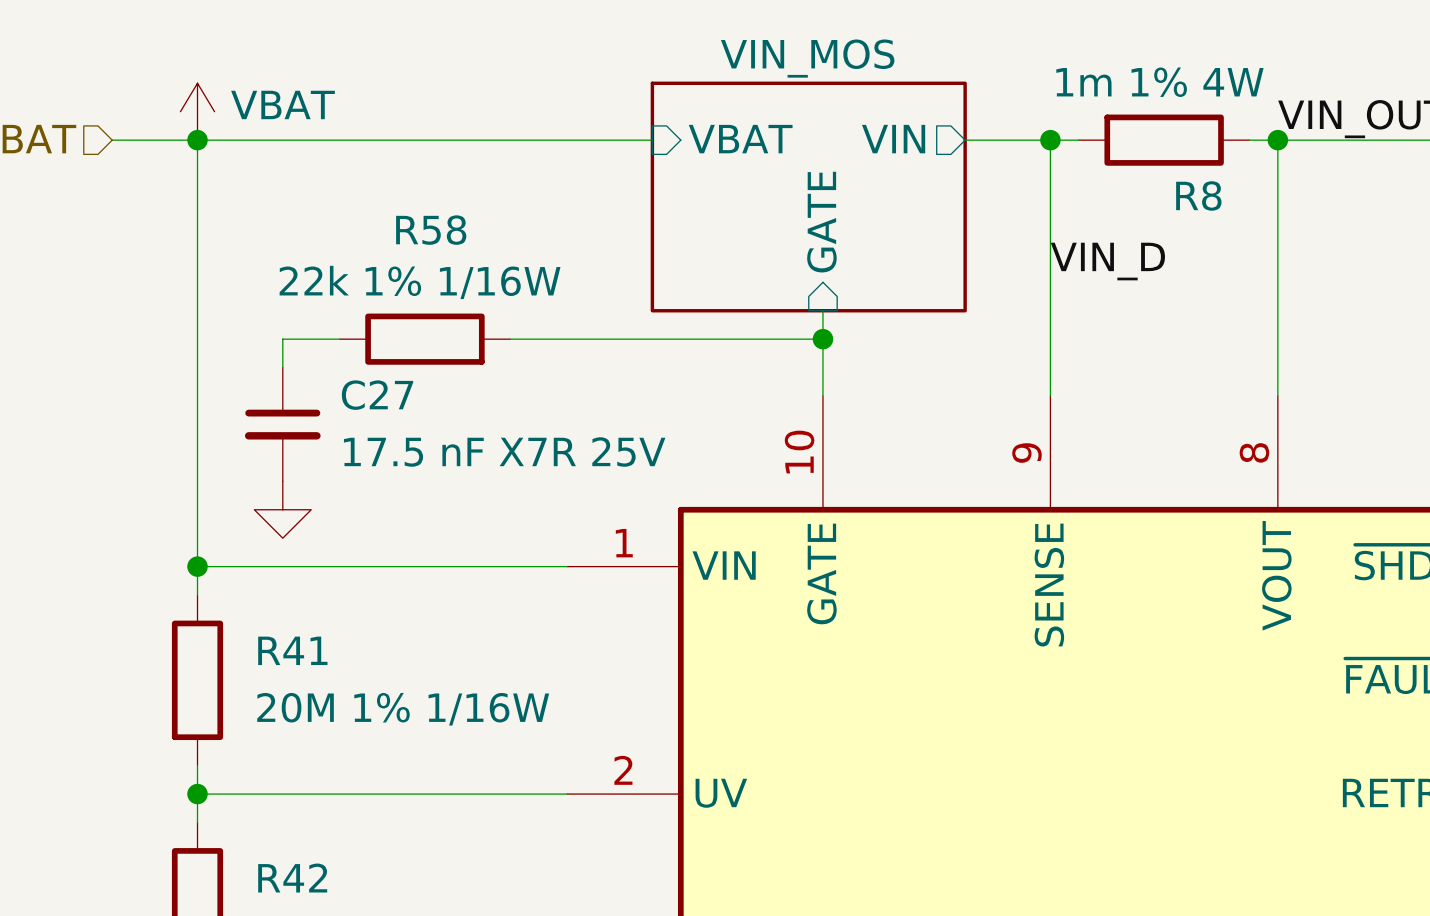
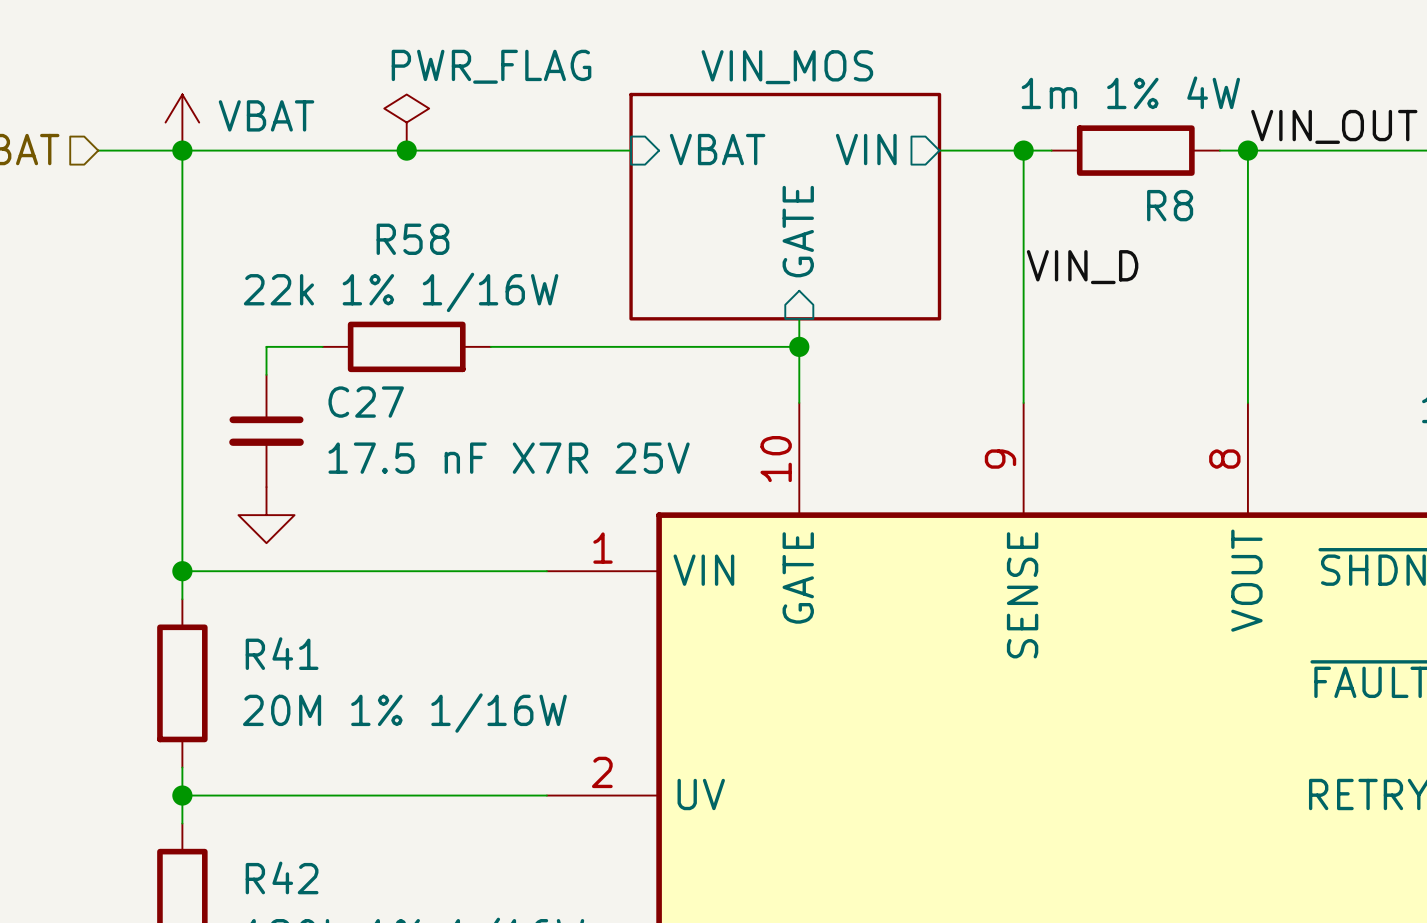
power symbol: none -> PWR_FLAG (406, 122)
junction: none -> (406, 150)

